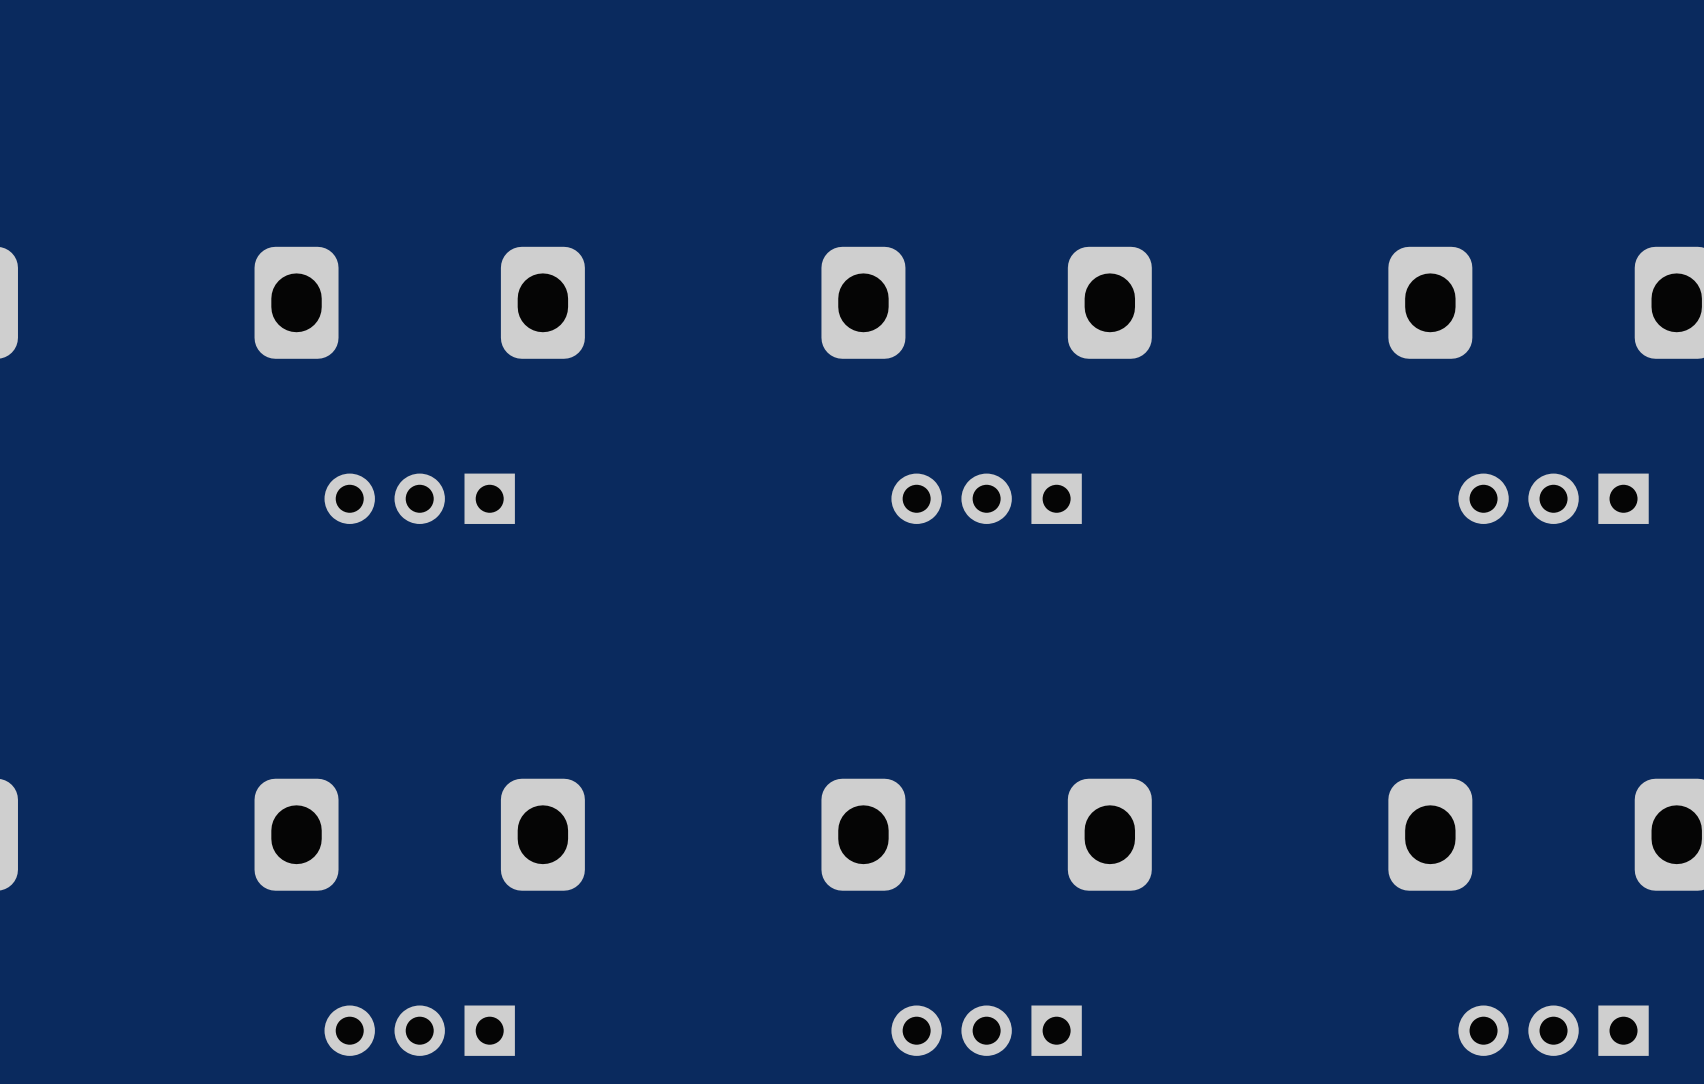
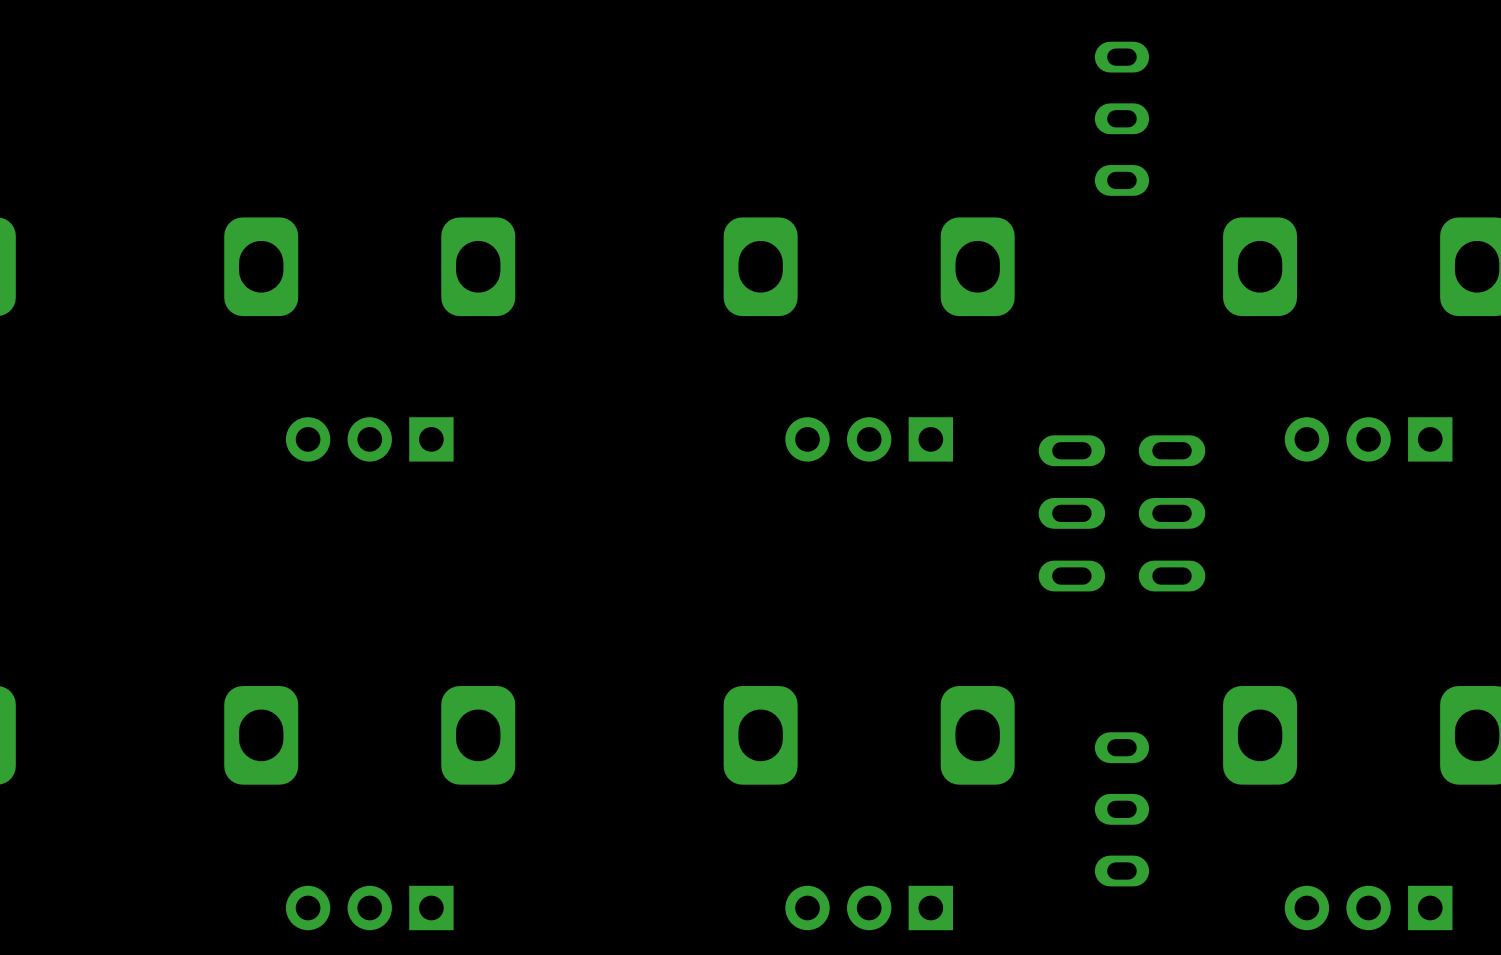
part: none -> (1121, 118)
part: none -> (1121, 513)
part: none -> (1121, 809)

